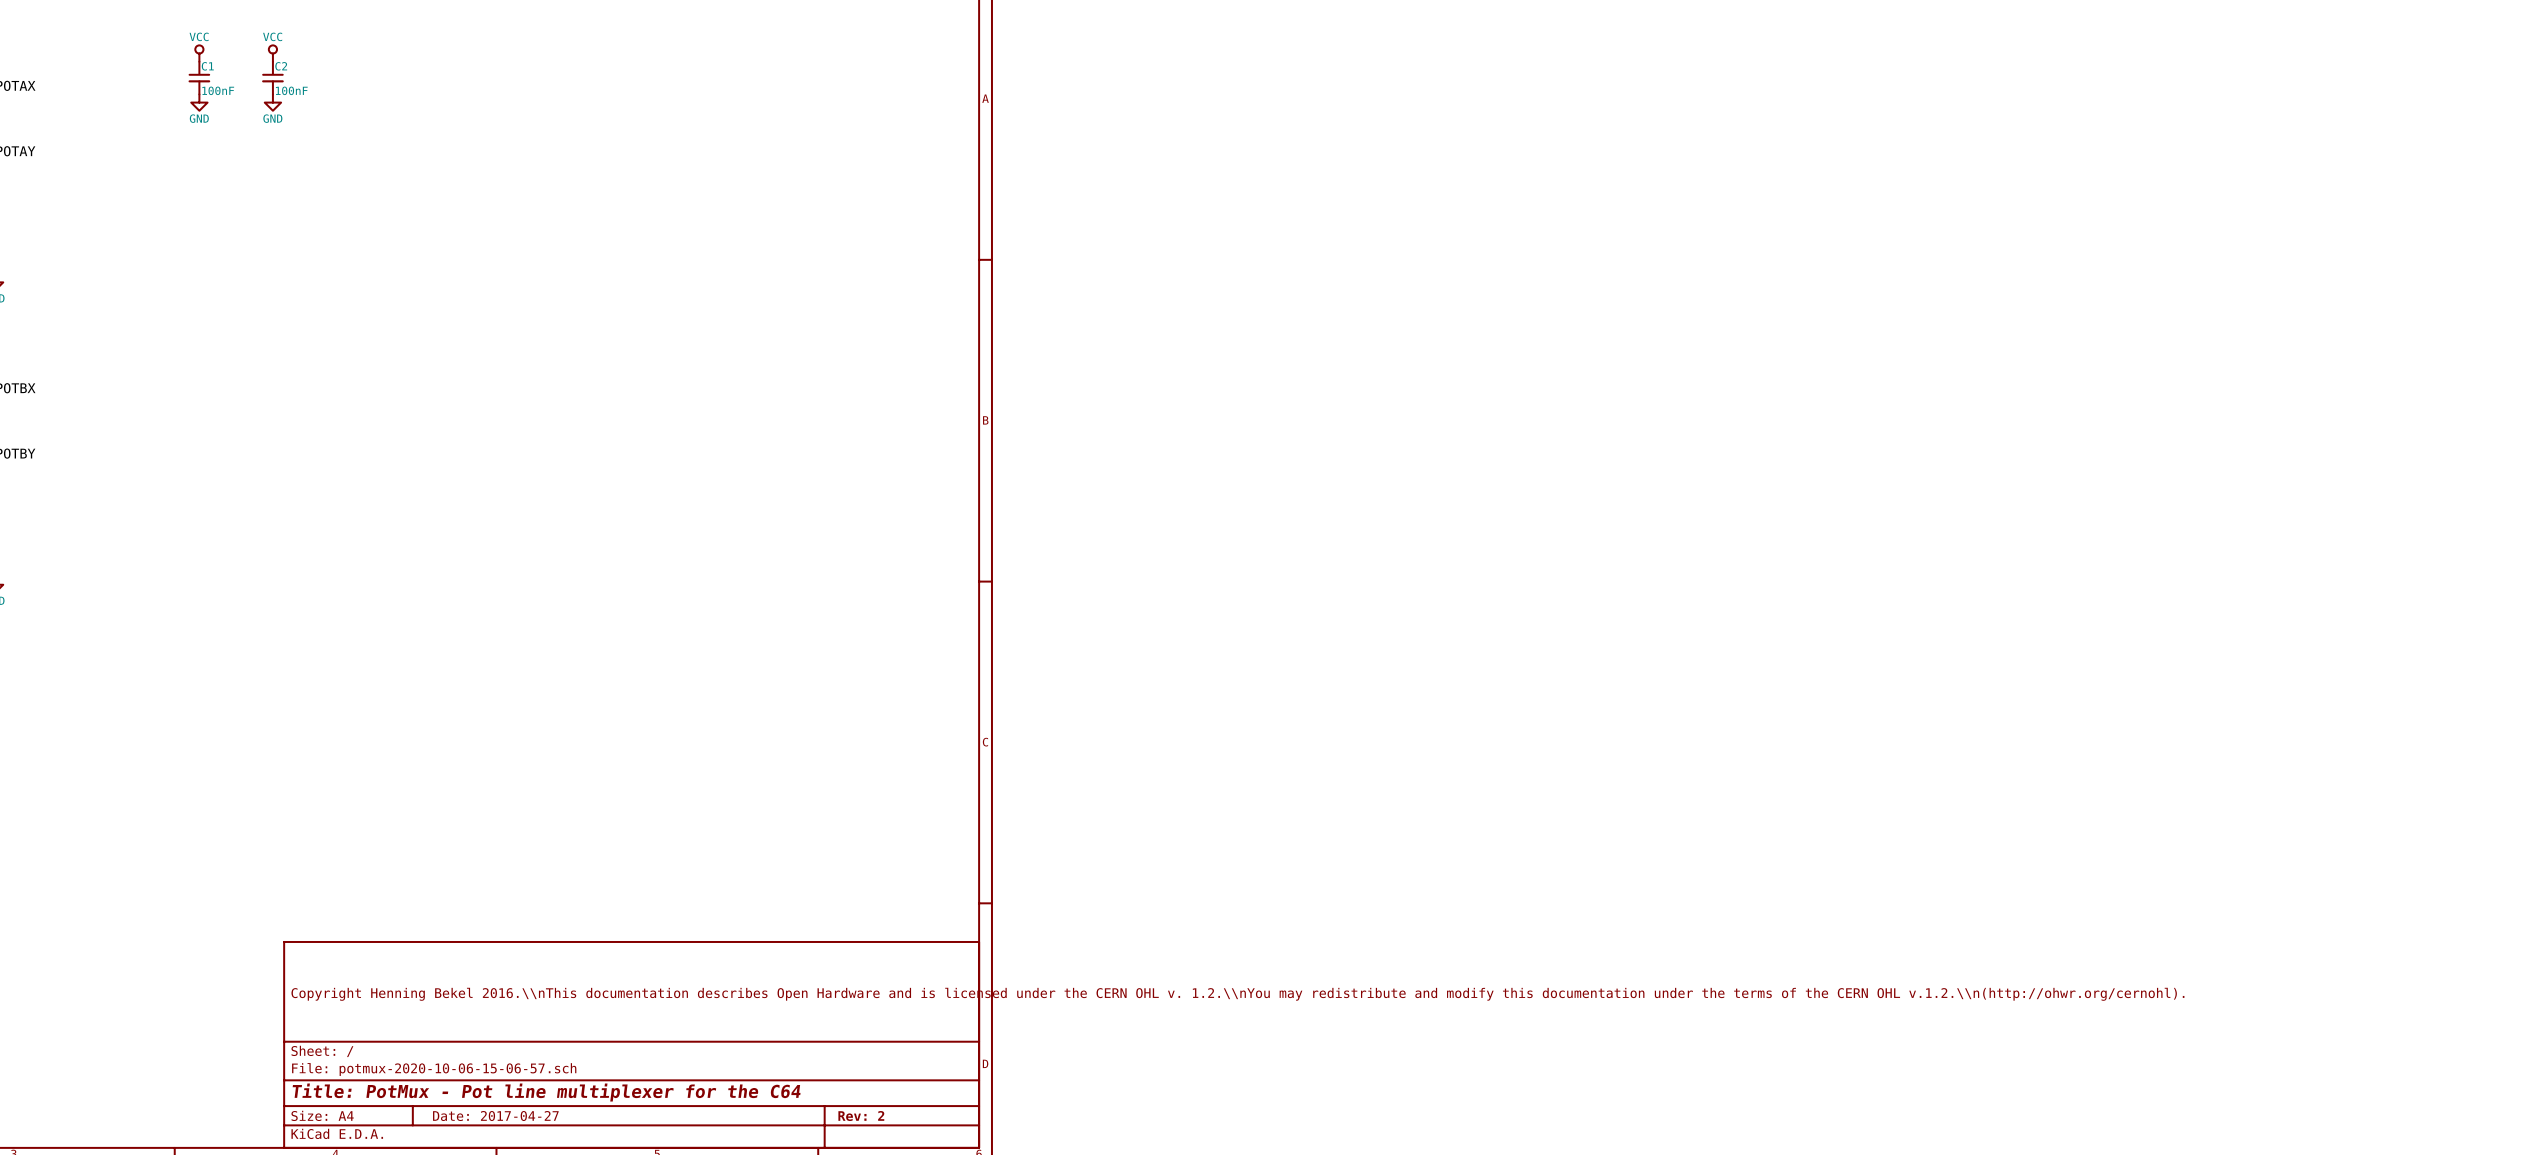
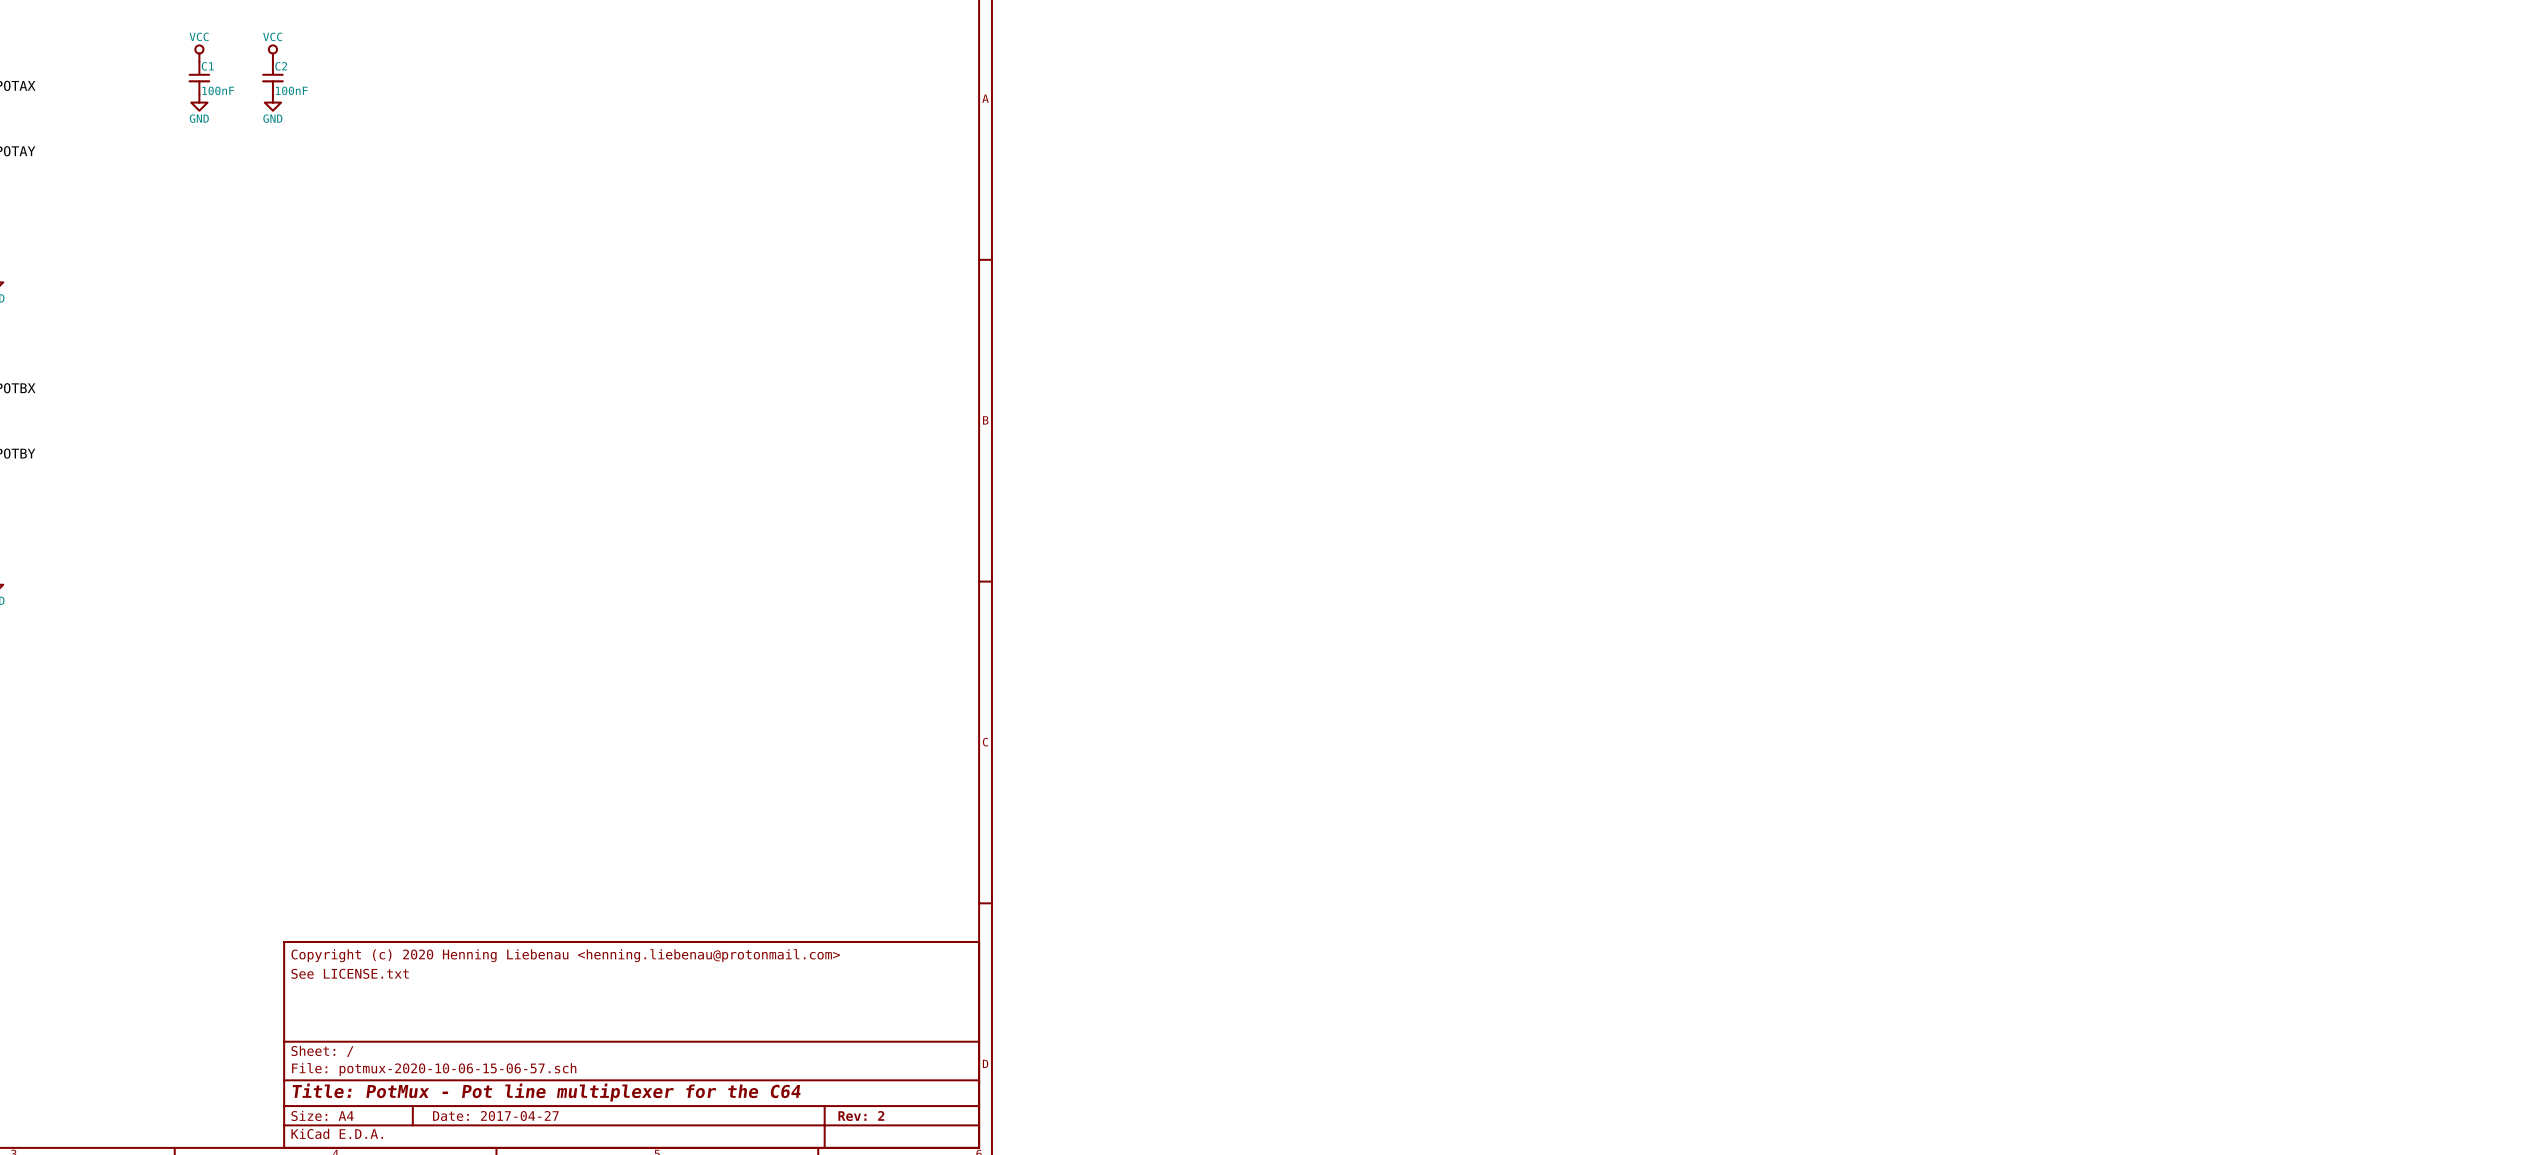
title block: none -> Copyright (c) 2020 Henning Liebenau <henning.liebenau@protonmail.com> (565, 955)
title block: none -> See LICENSE.txt (350, 973)
title block: Copyright Henning Bekel 2016.\\nThis documentation describes Open Hardware and is licensed under the CERN OHL v. 1.2.\\nYou may redistribute and modify this documentation under the terms of the CERN OHL v.1.2.\\n(http://ohwr.org/cernohl). (1237, 994) -> none

